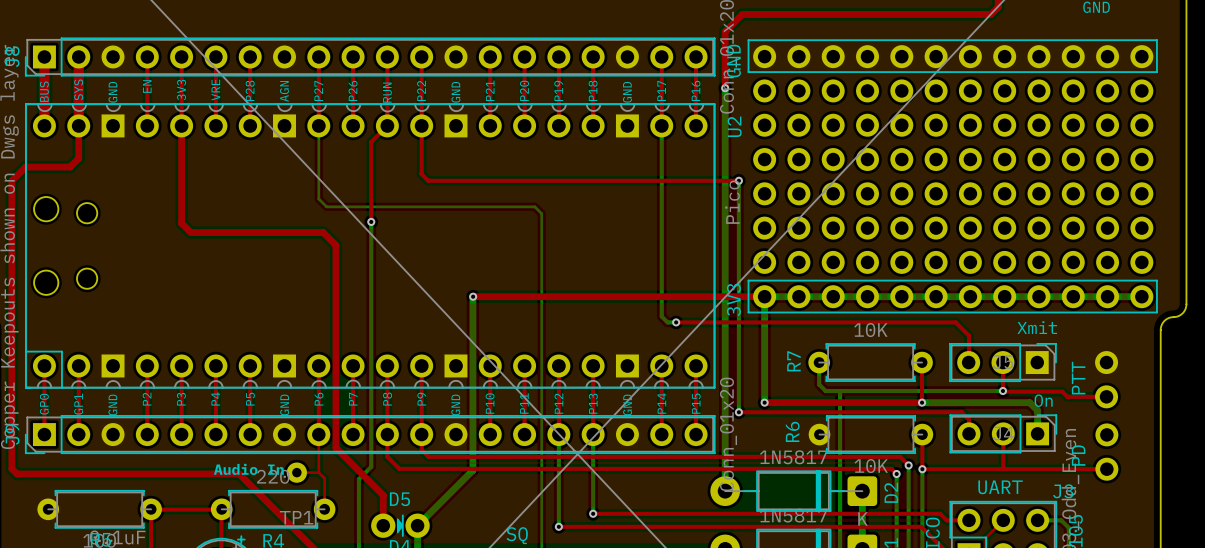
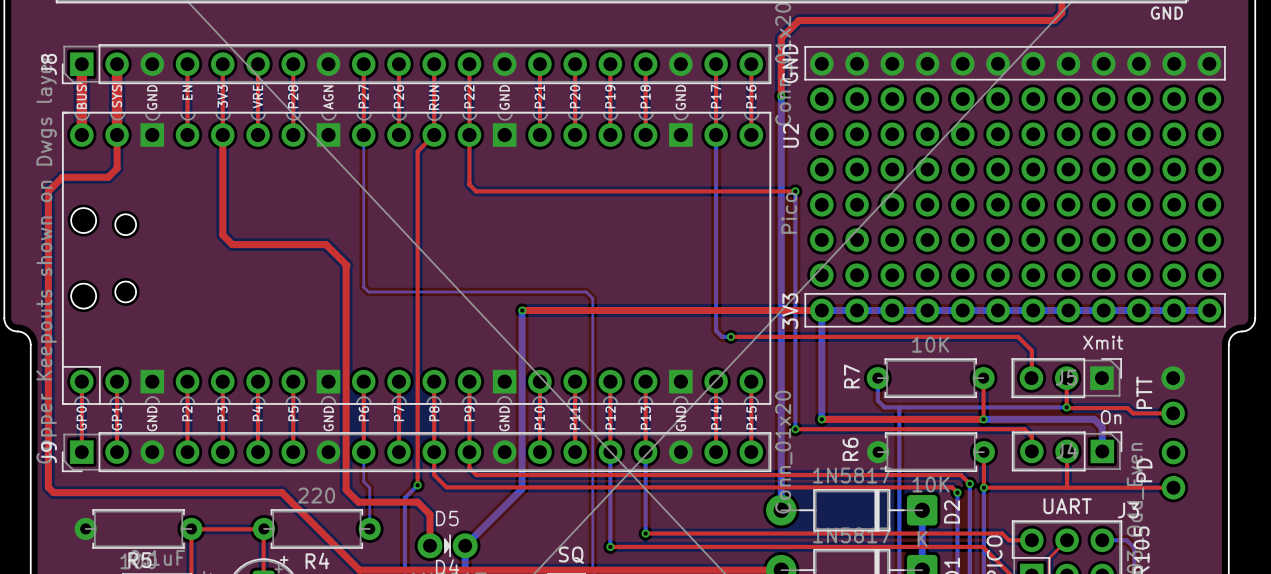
bottom track: (318, 198) (326, 206) (534, 206) (541, 213) (541, 285) -> (363, 210) (363, 287) (368, 291) (586, 291) (592, 298)
top track: none -> (417, 233) (417, 485)
bottom track: (371, 221) (371, 466) -> none
via: (371, 221) -> none
top track: (282, 232) (323, 232) (335, 245) (335, 447) (371, 483) -> (326, 244) (346, 265) (346, 489) (358, 502) (417, 502)
top track: (318, 434) (318, 472) -> none
bottom track: none -> (363, 452) (363, 481) (369, 487) (369, 528)
via: none -> (417, 485)
text: Audio In (248, 469) -> none
top track: (296, 472) (318, 472) -> none
TP1: (296, 472) -> none
top track: (318, 472) (324, 478) (324, 509) -> none

